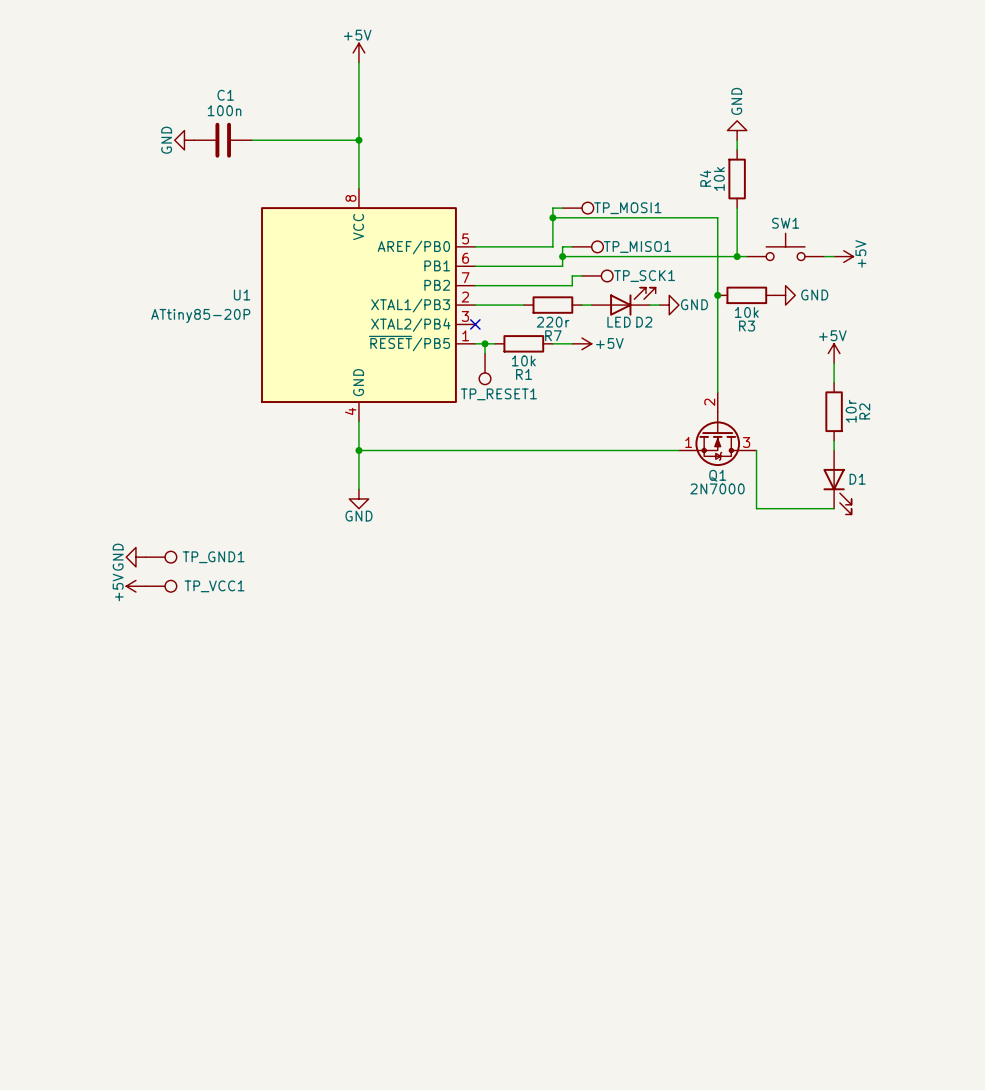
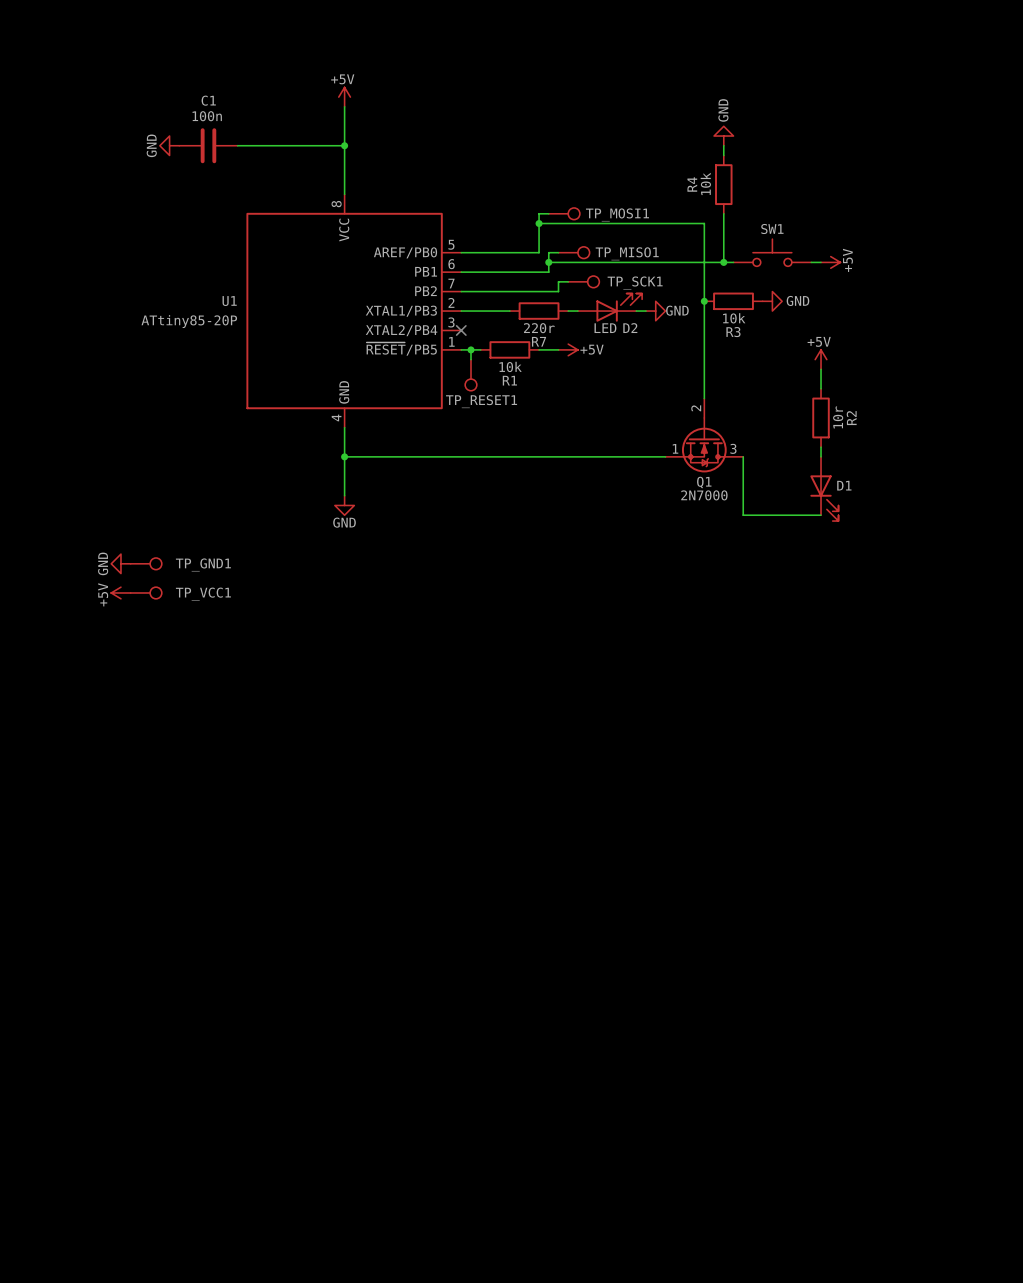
power symbol position: +5V (358, 52) -> +5V (344, 97)

